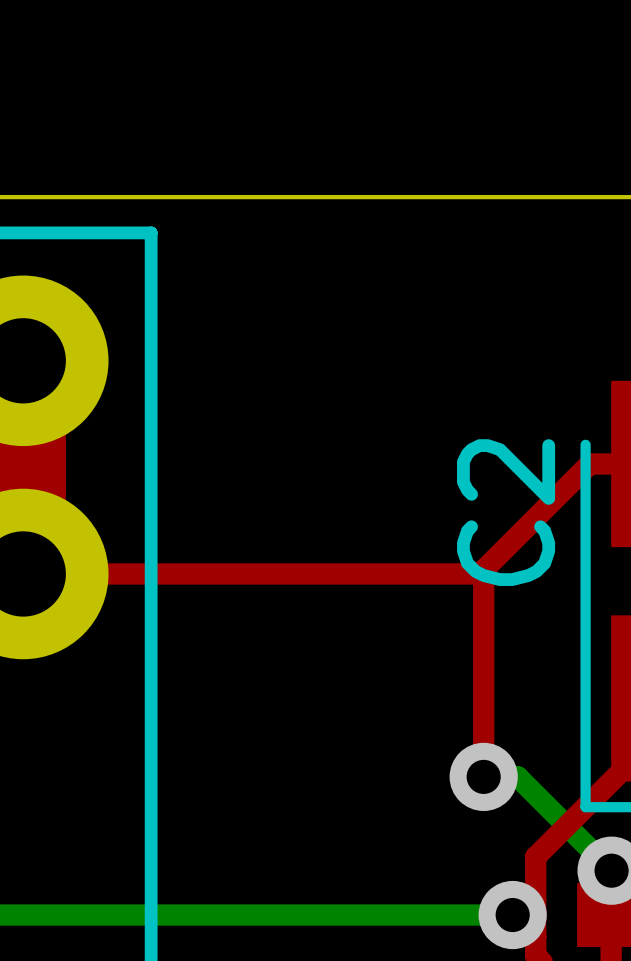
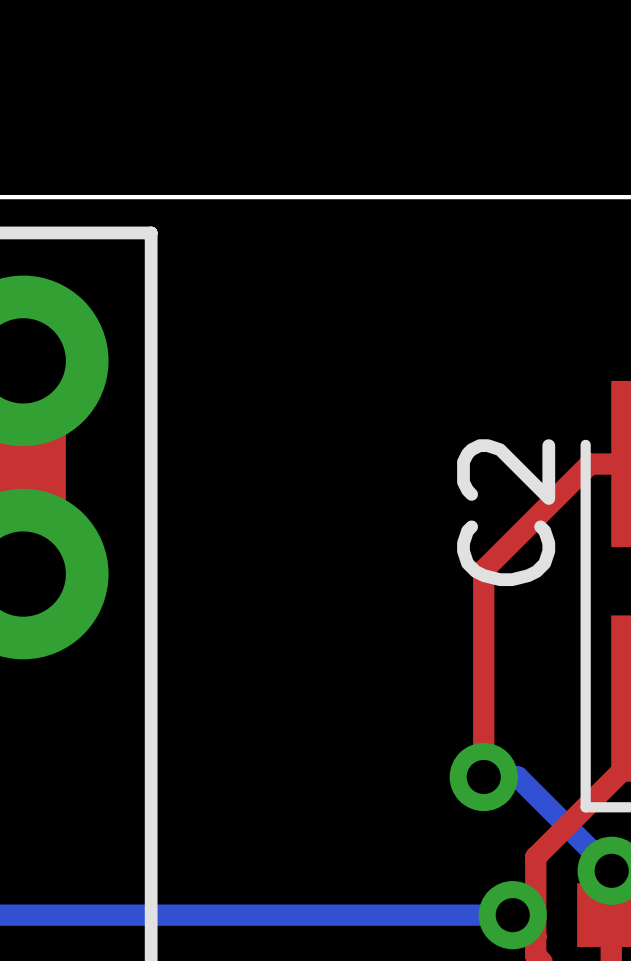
top track: (483, 570) (479, 573) (23, 573) -> none

